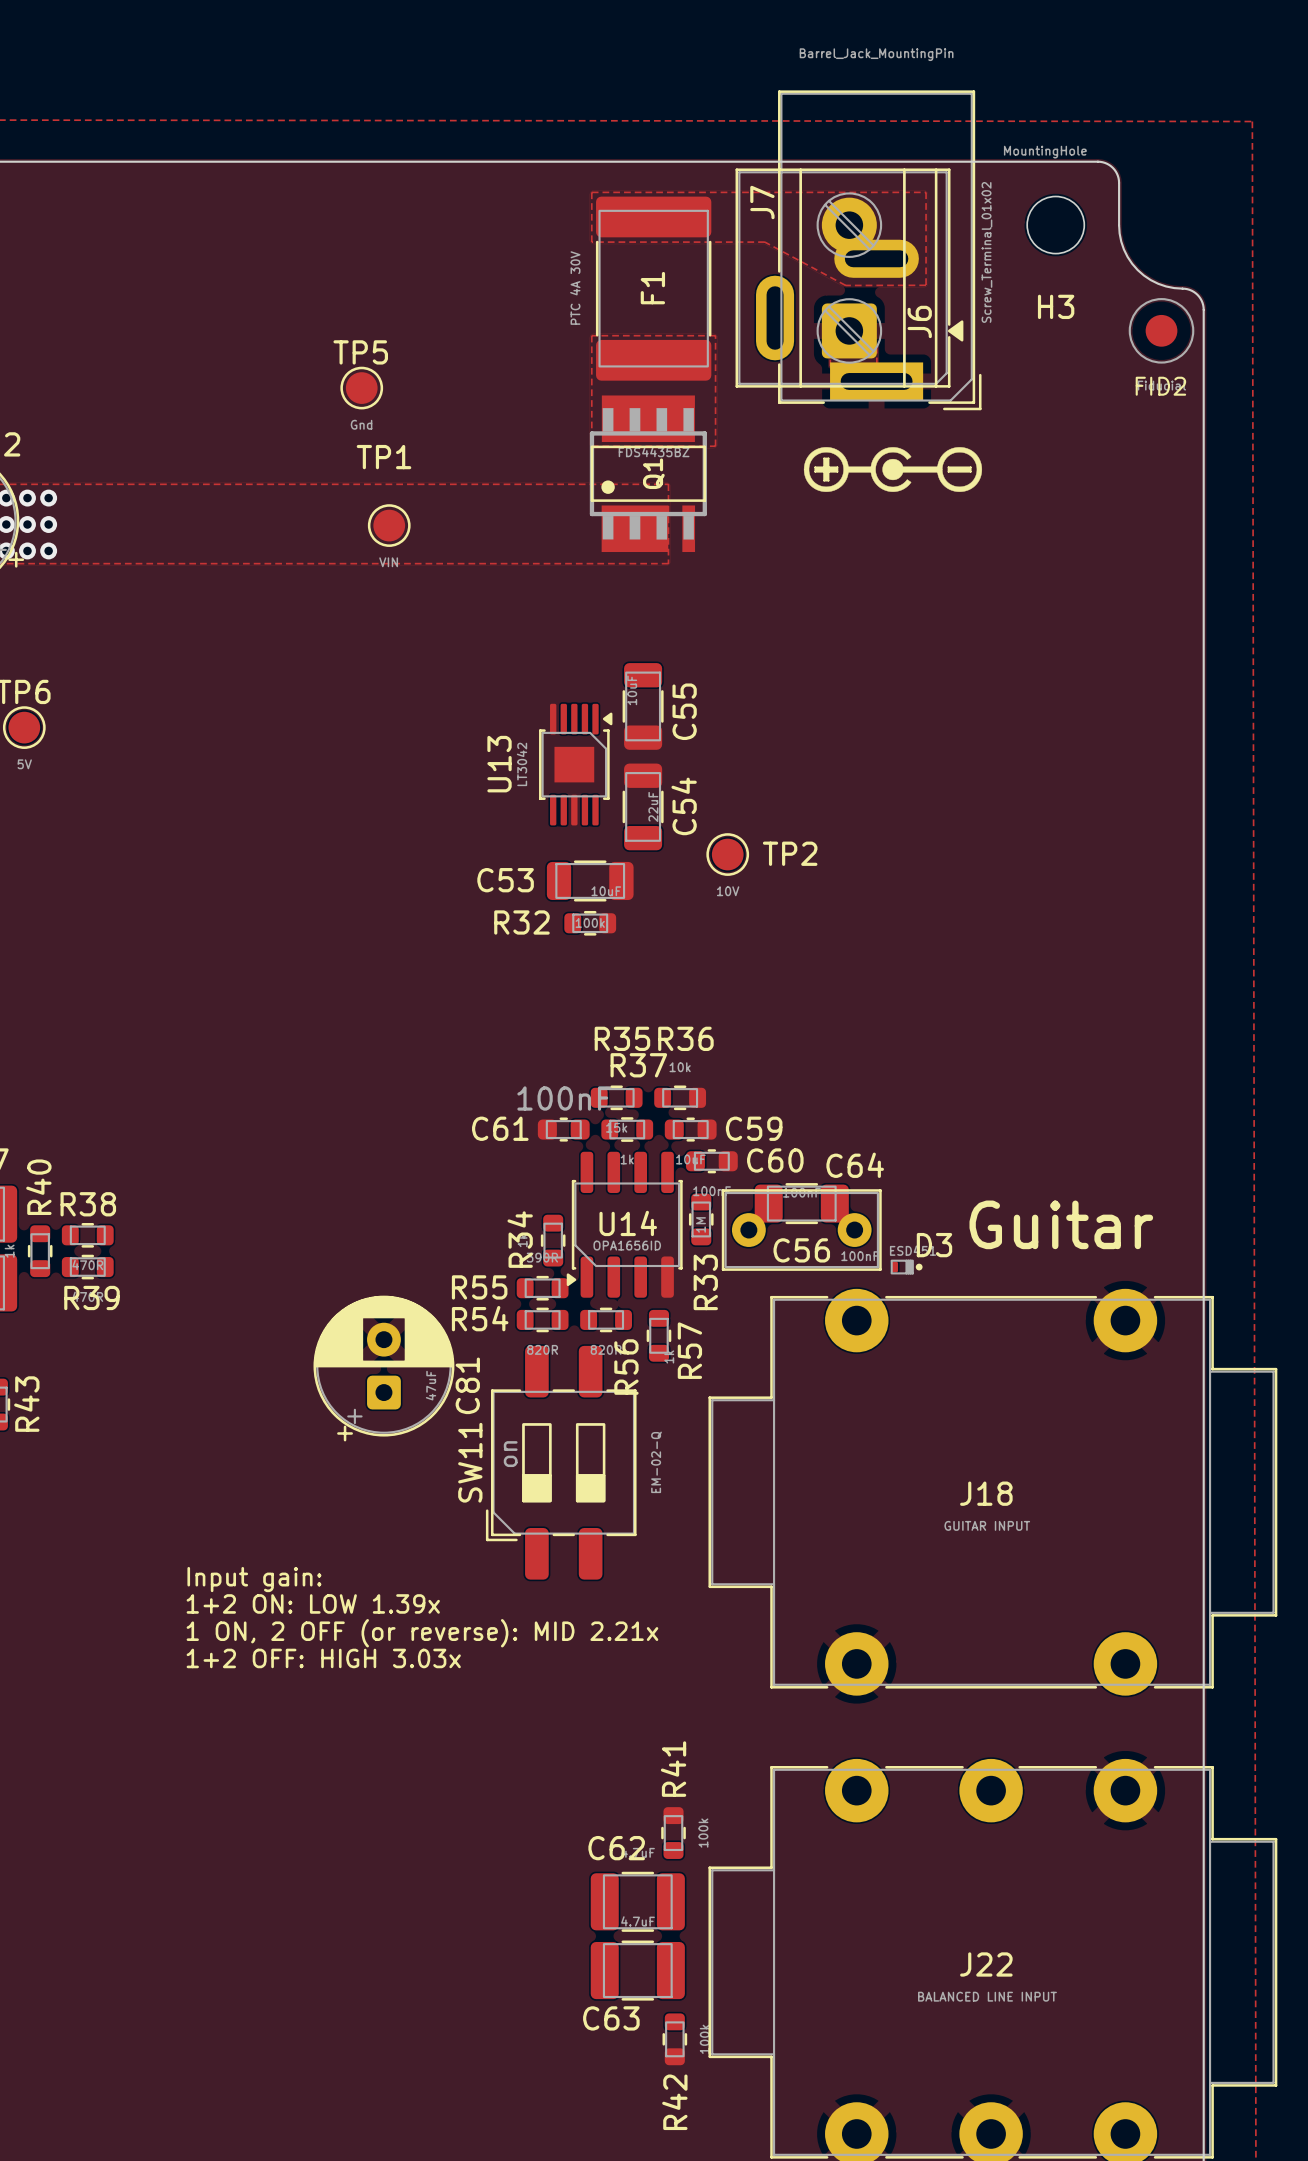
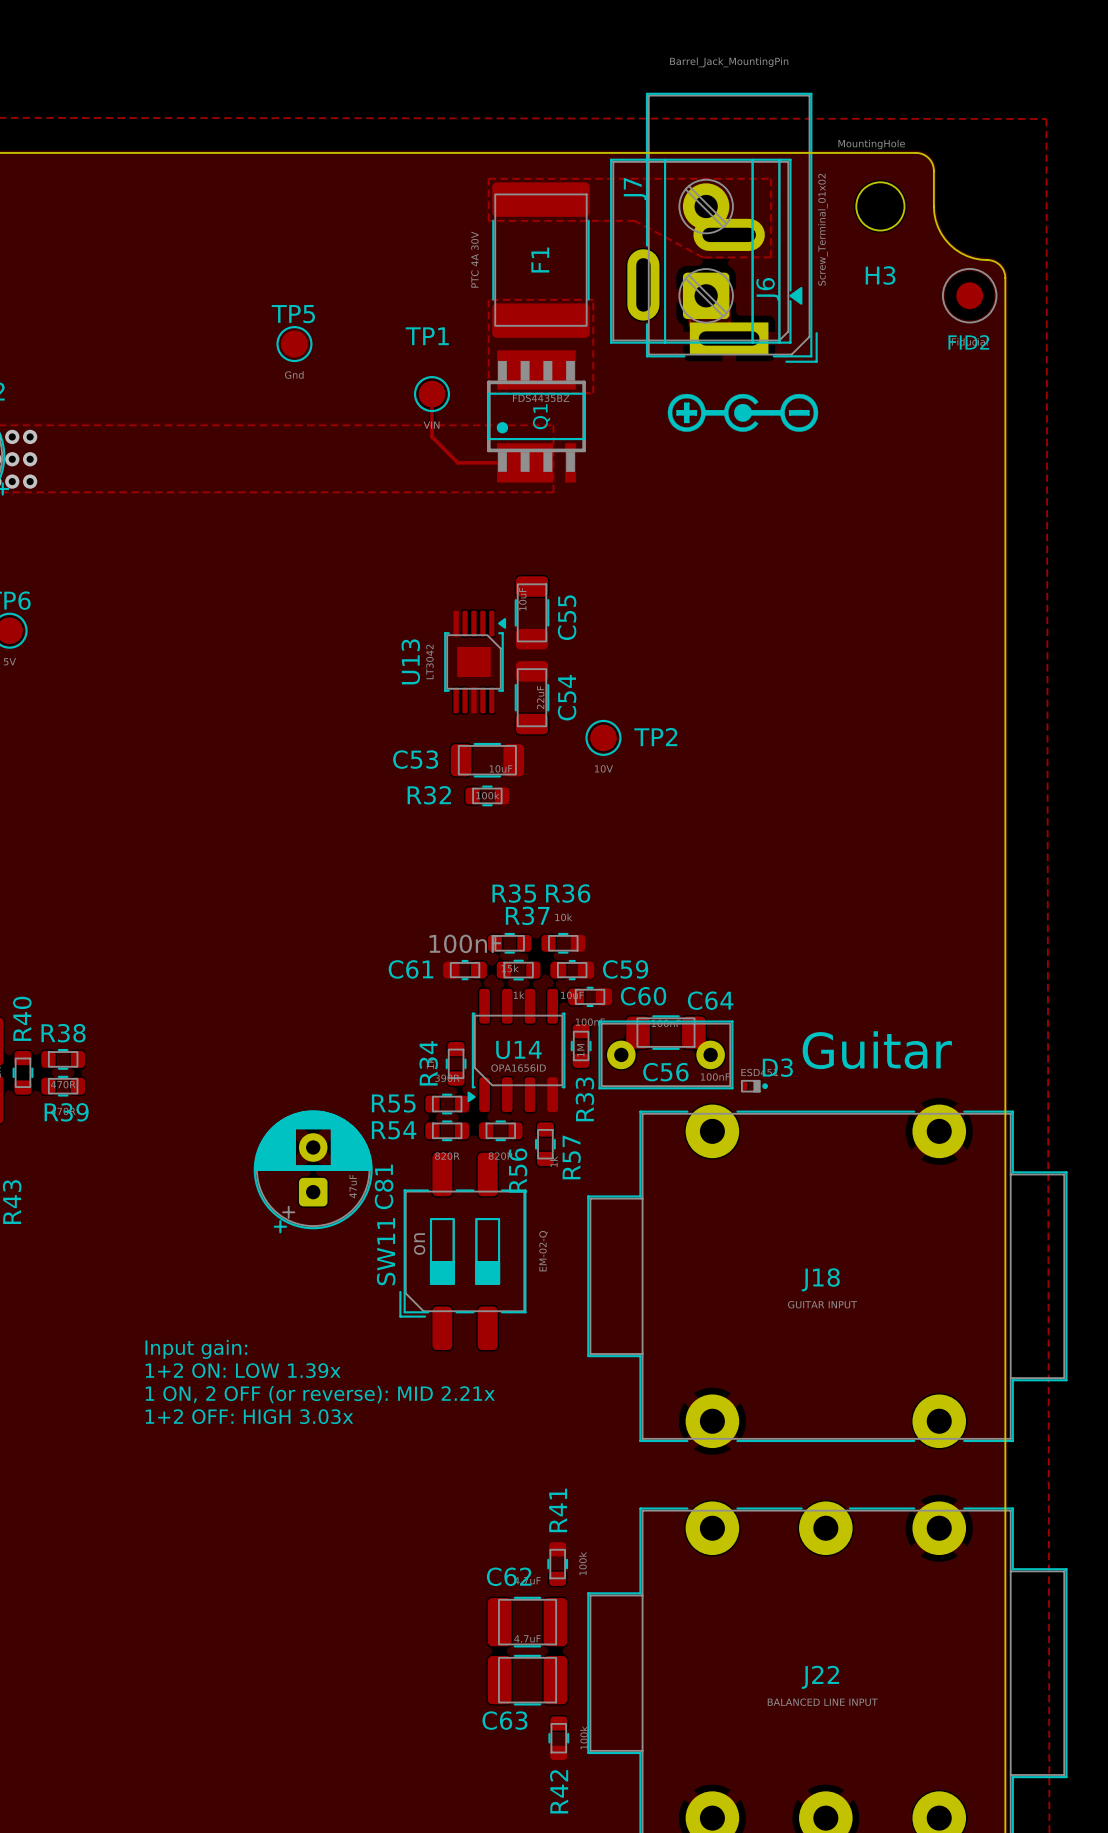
track: none -> (431, 394) (431, 436) (457, 462) (525, 462)
TP1 position: (389, 525) -> (431, 394)

